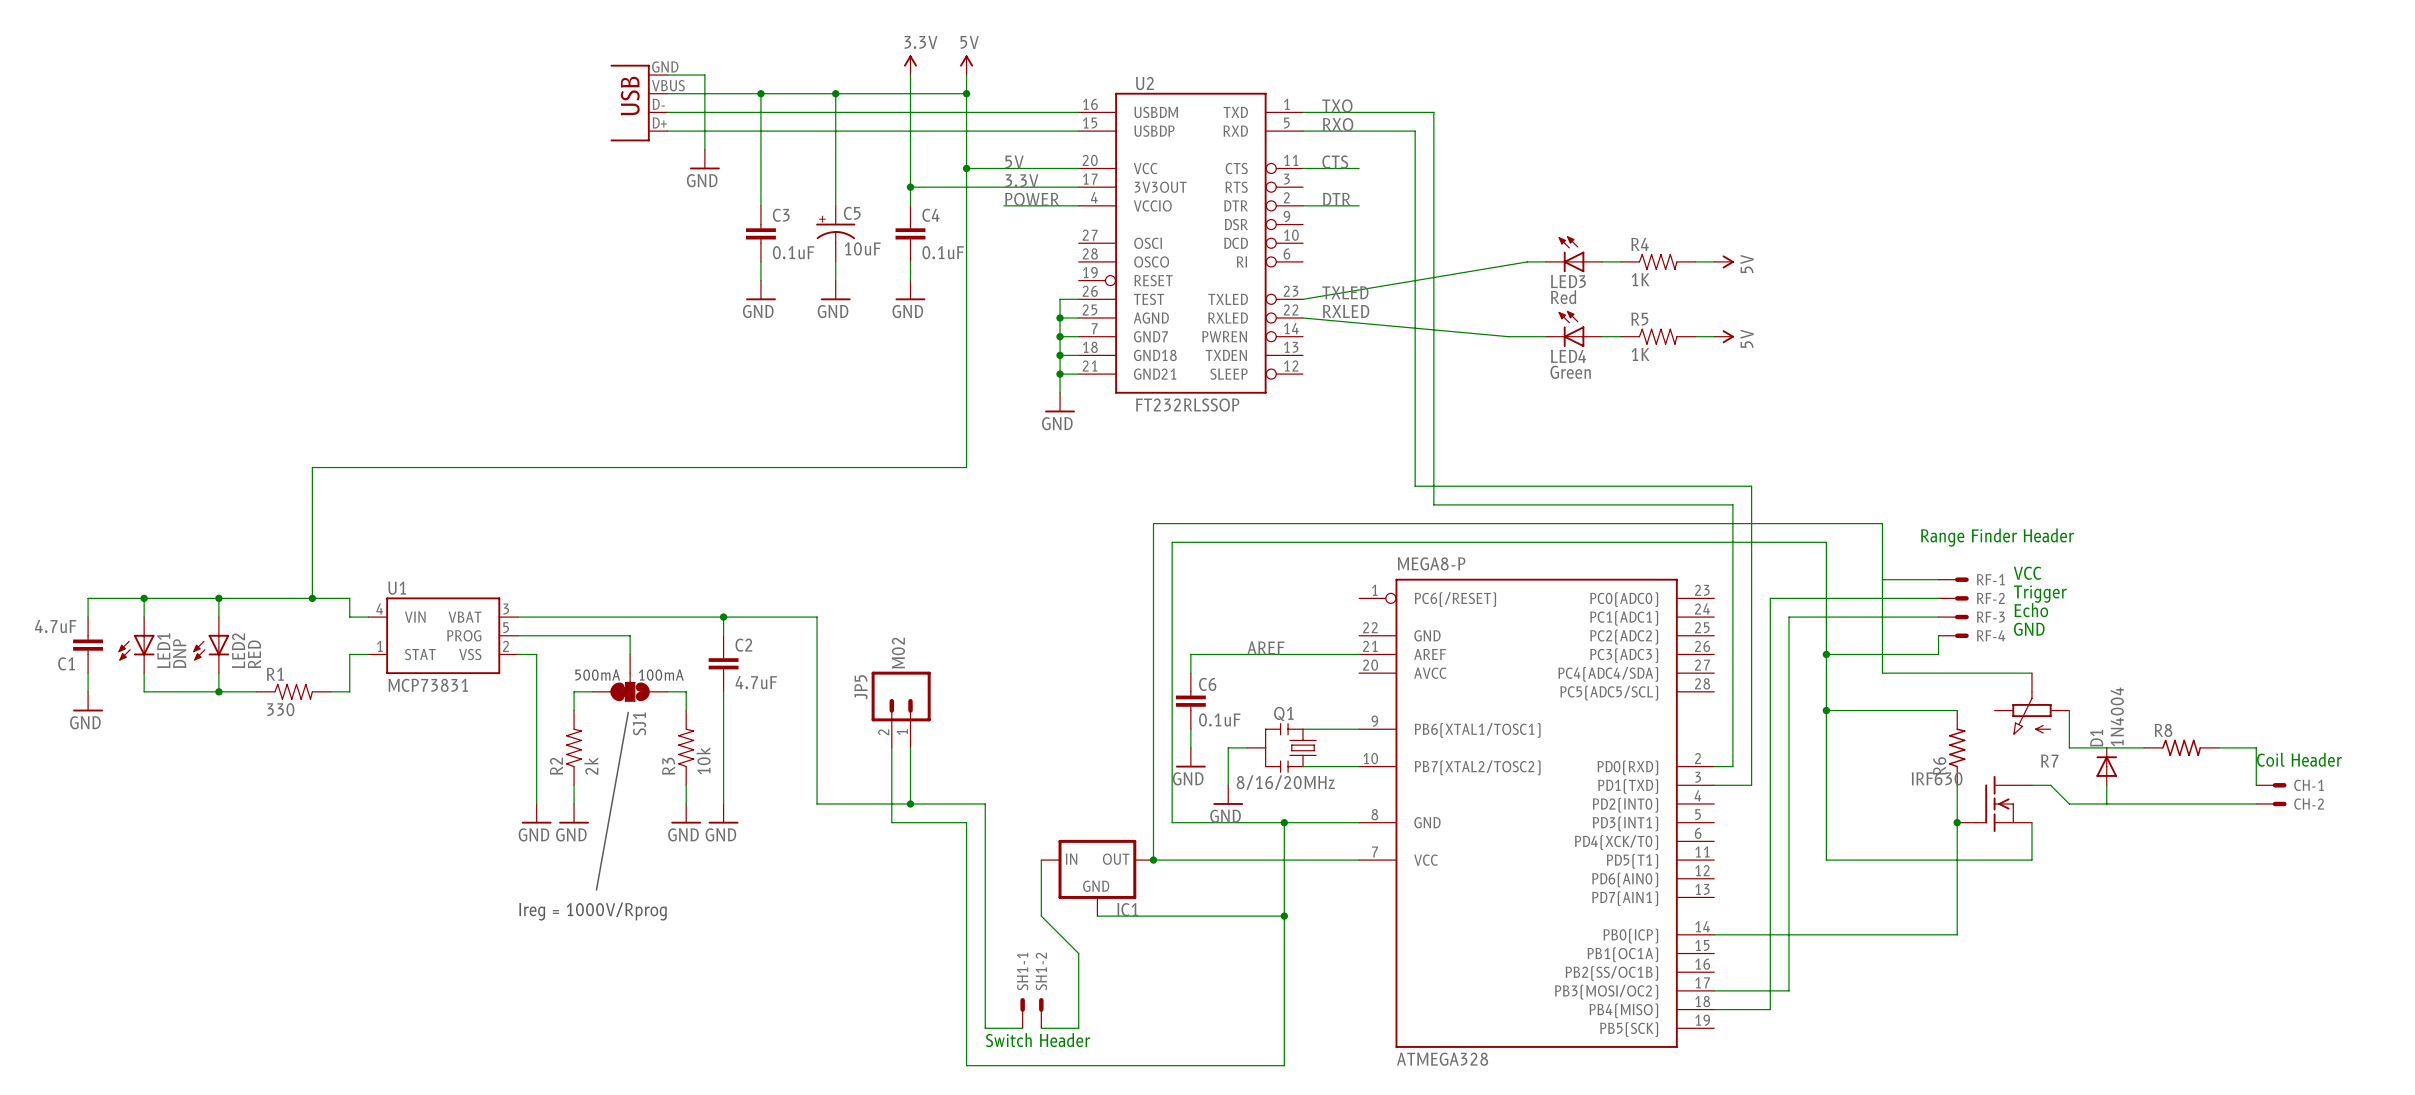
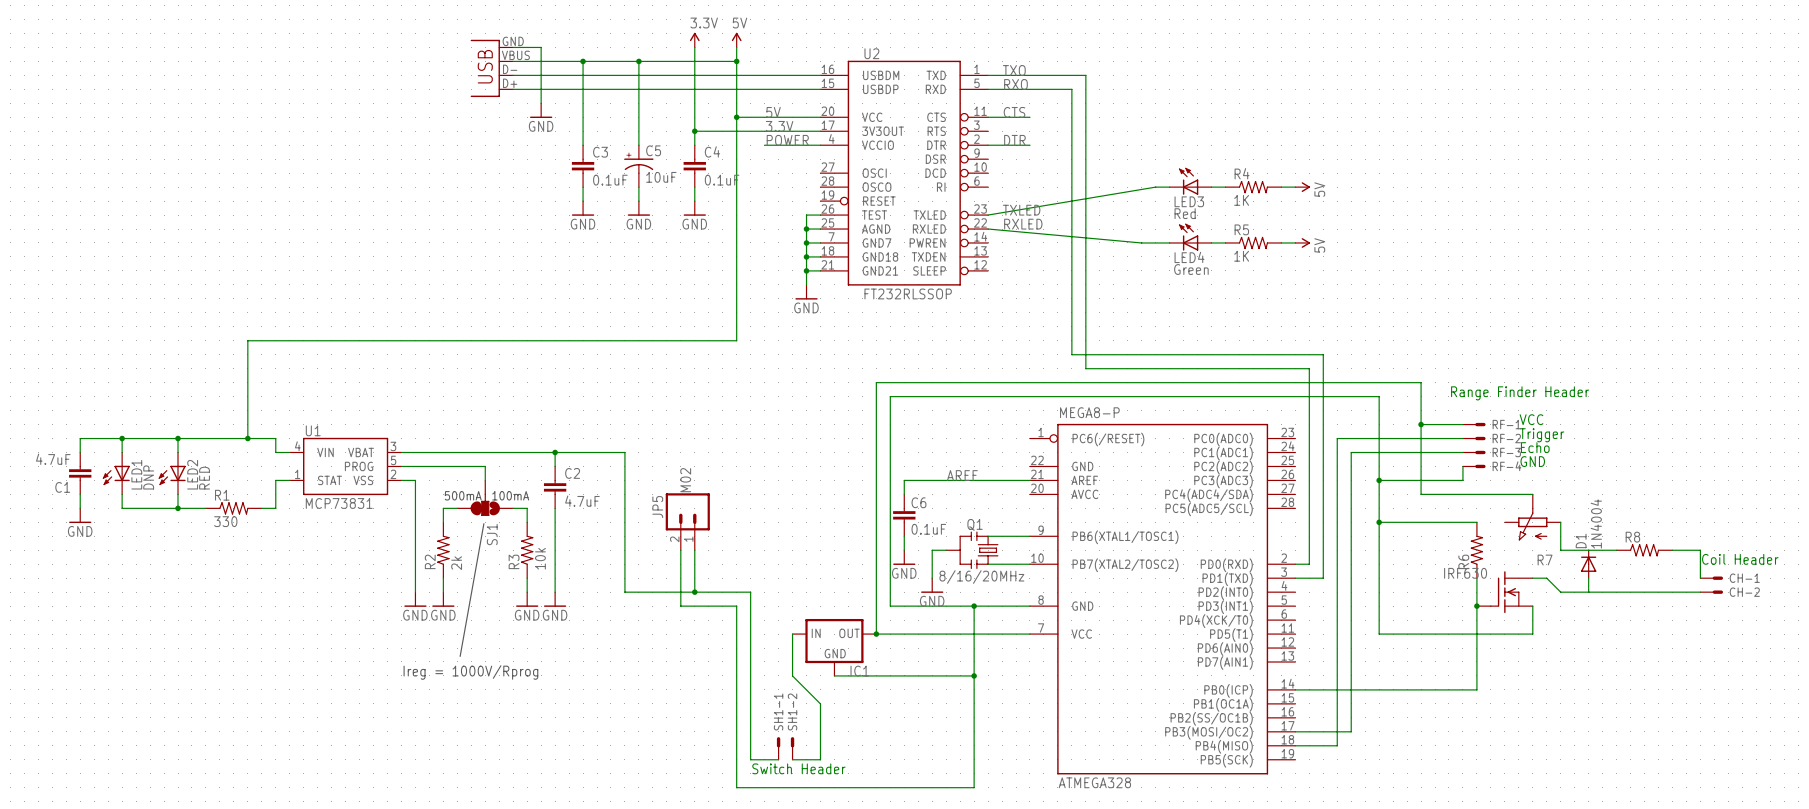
junction: none -> (1421, 424)

